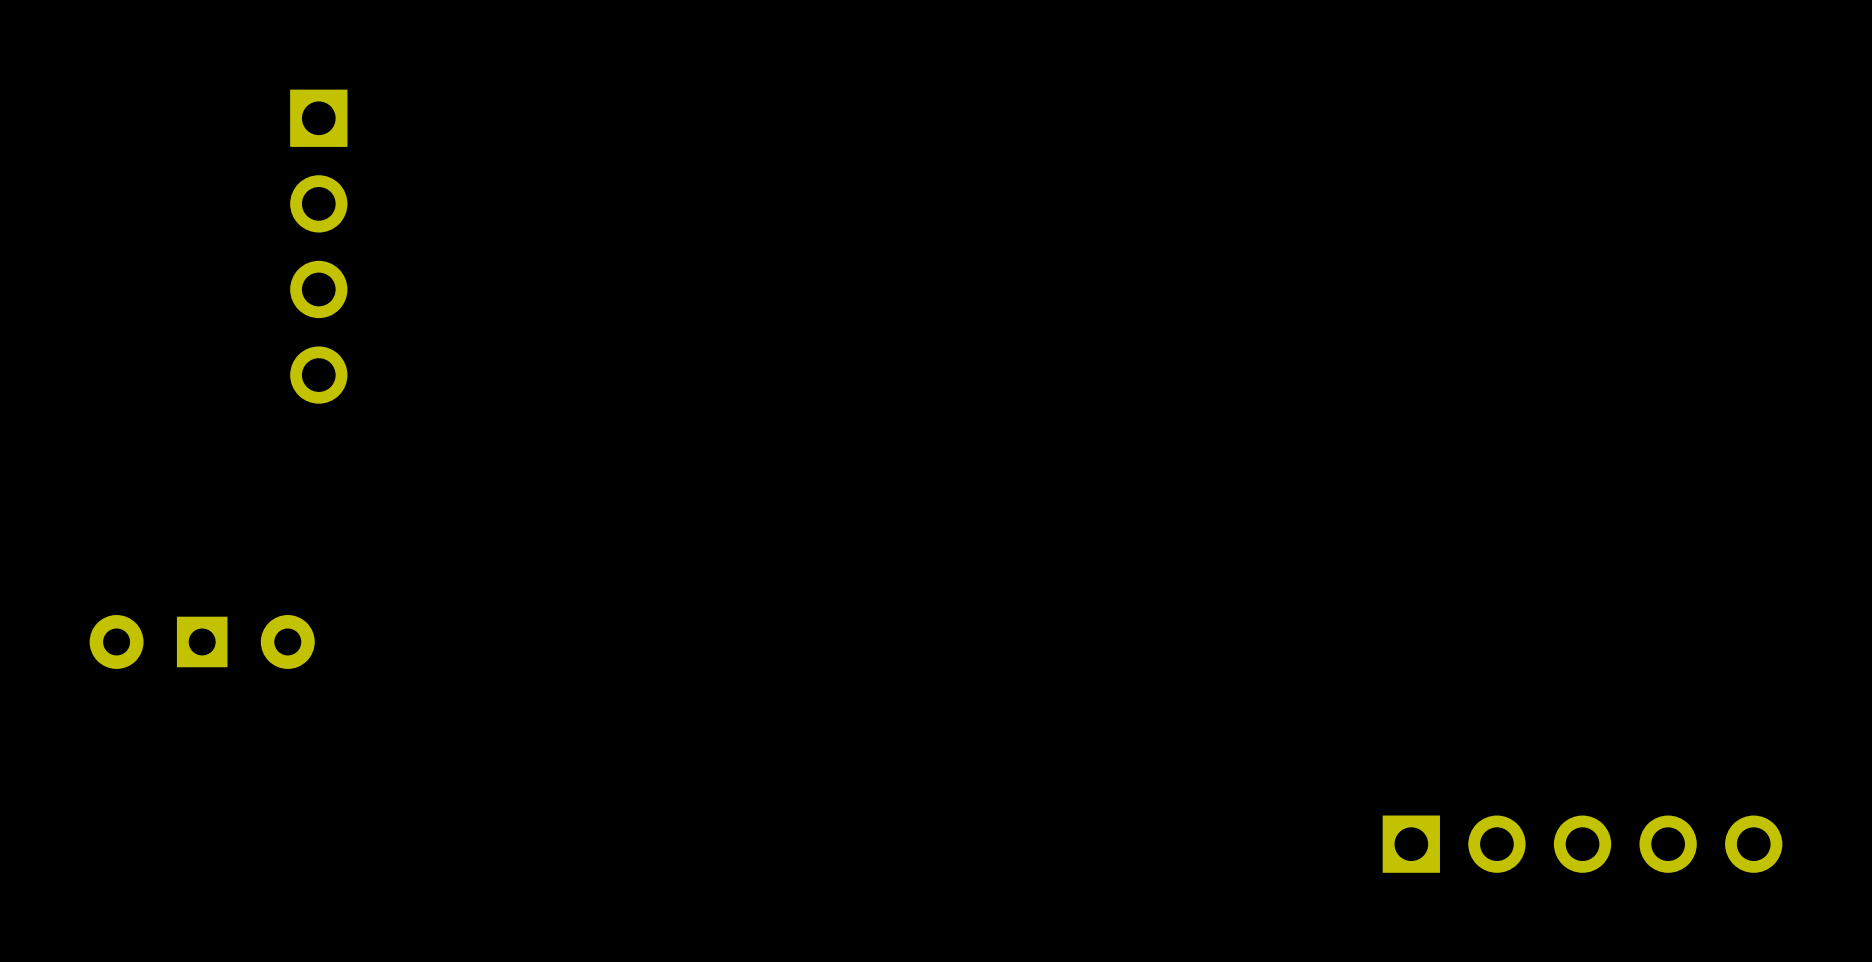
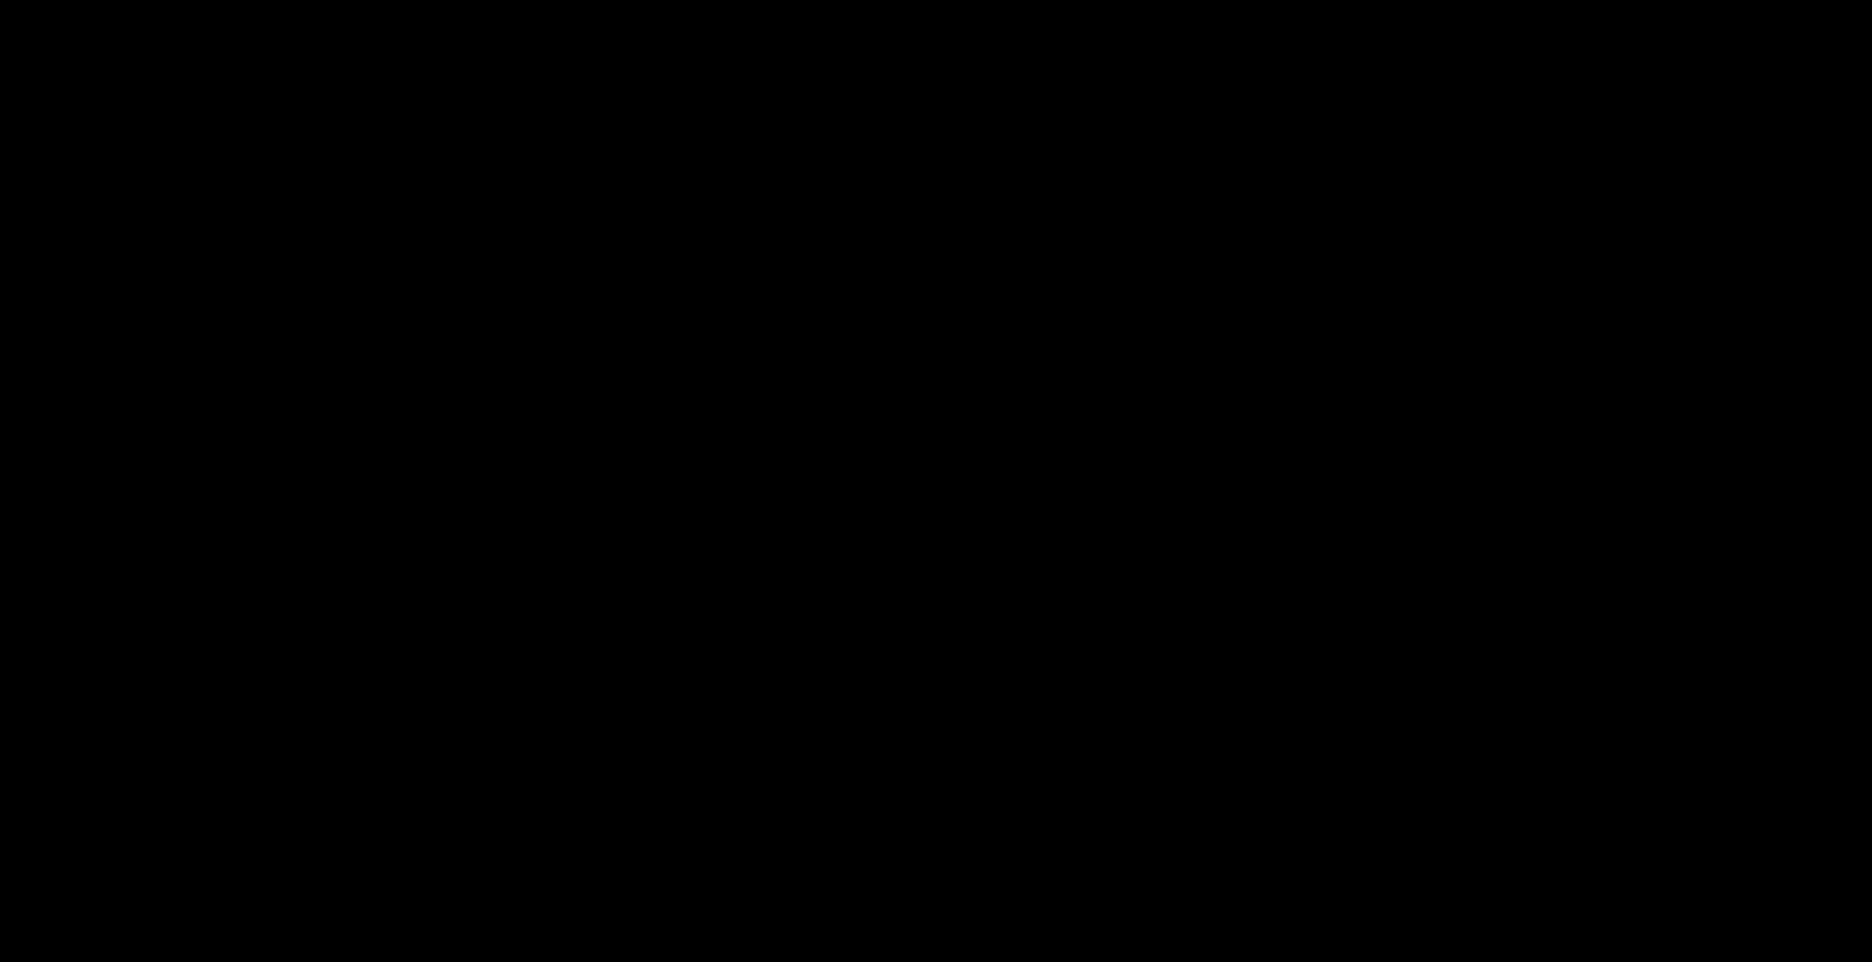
part: (318, 246) -> none
part: (202, 641) -> none
part: (1582, 844) -> none

